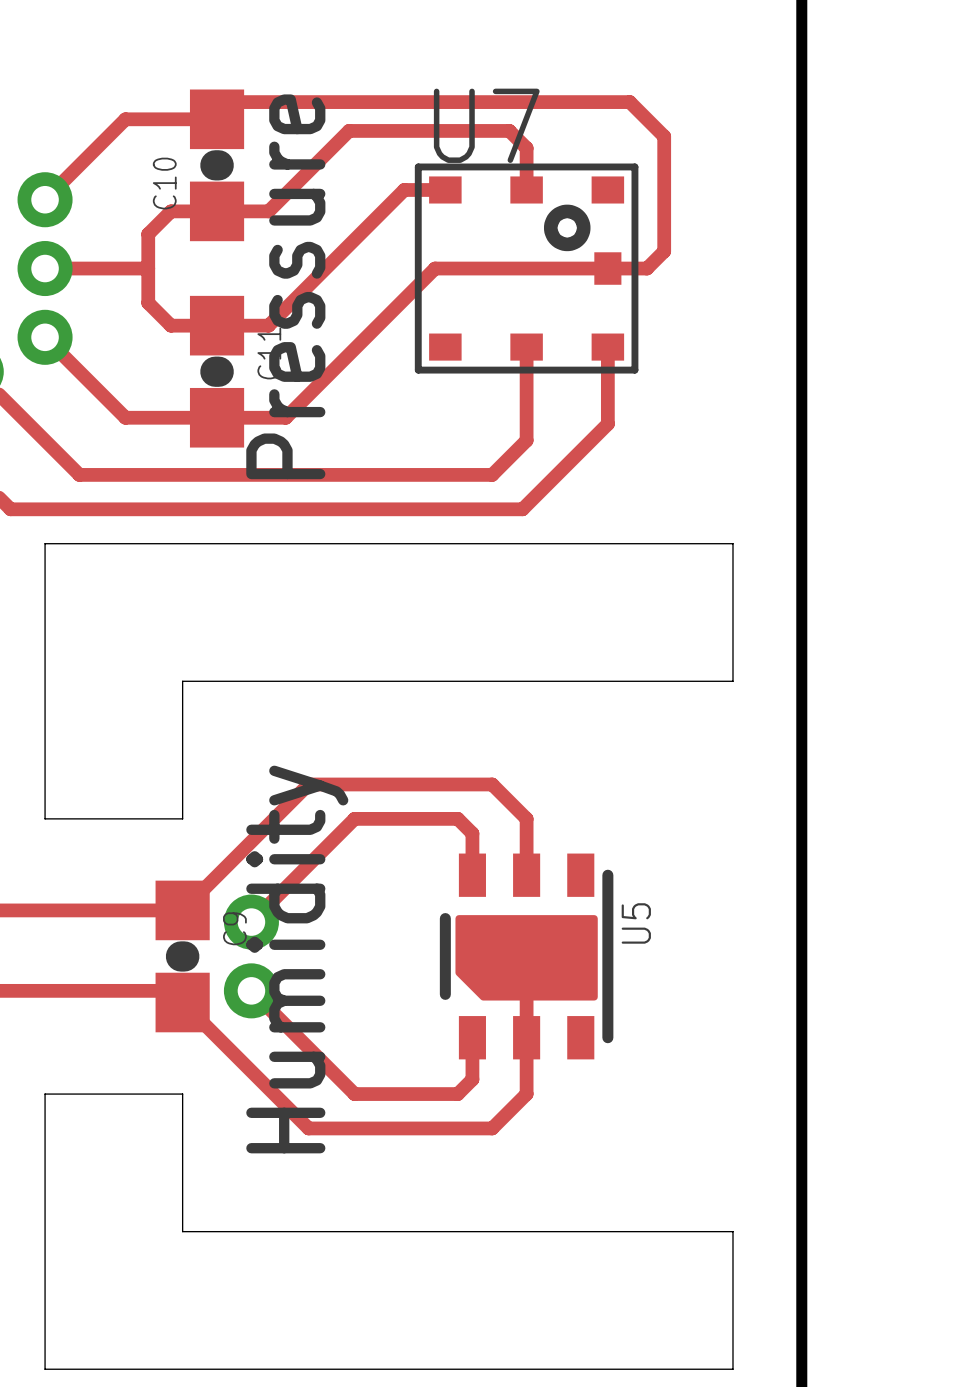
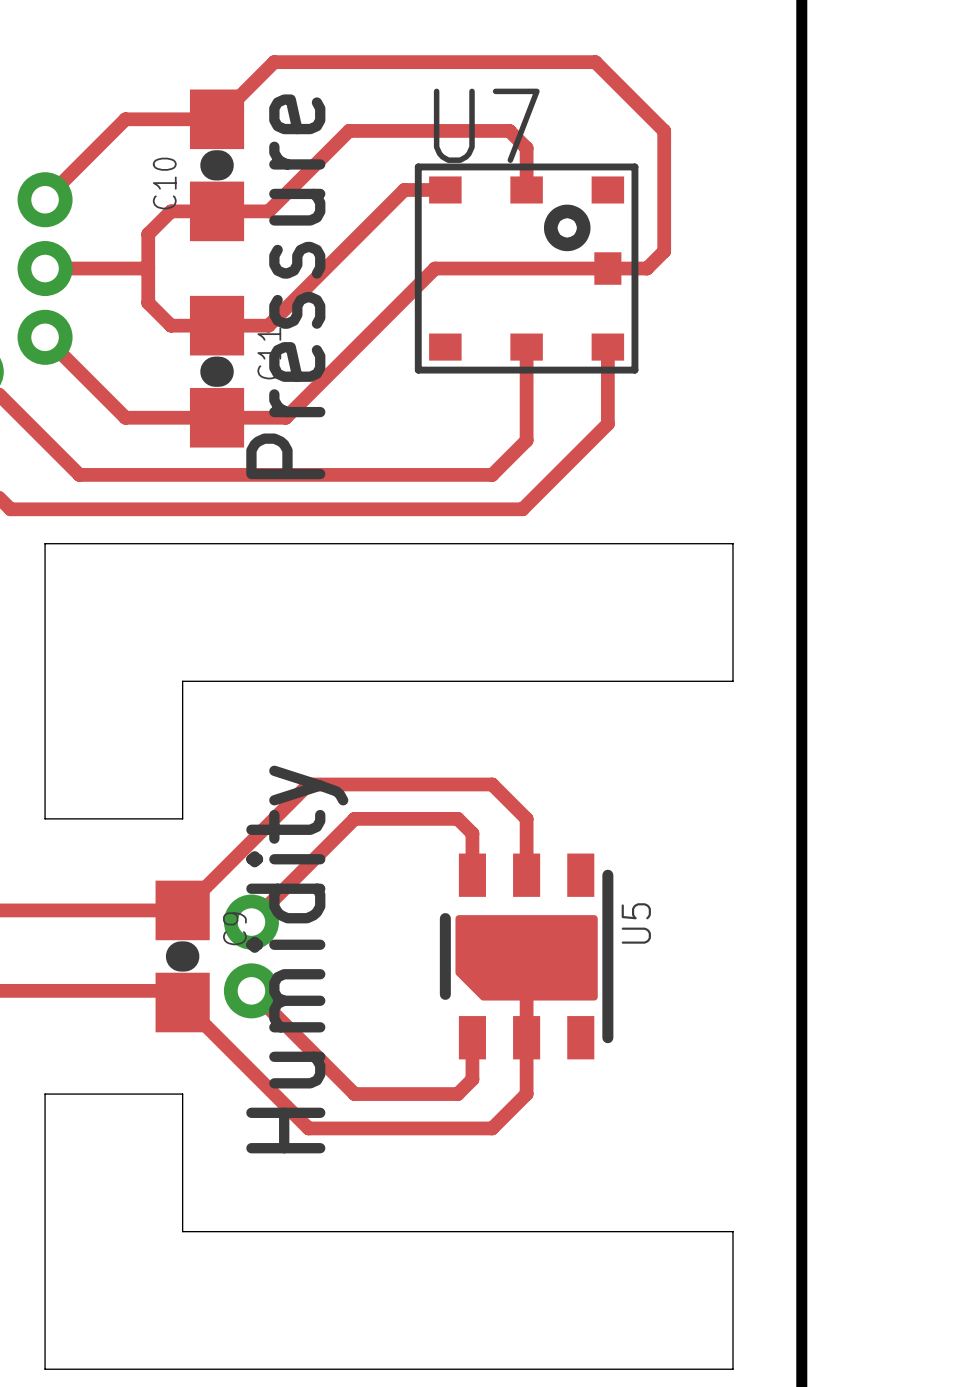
track: (234, 102) (629, 102) (664, 136) -> (234, 102) (274, 62) (595, 62) (664, 130) (664, 136)

